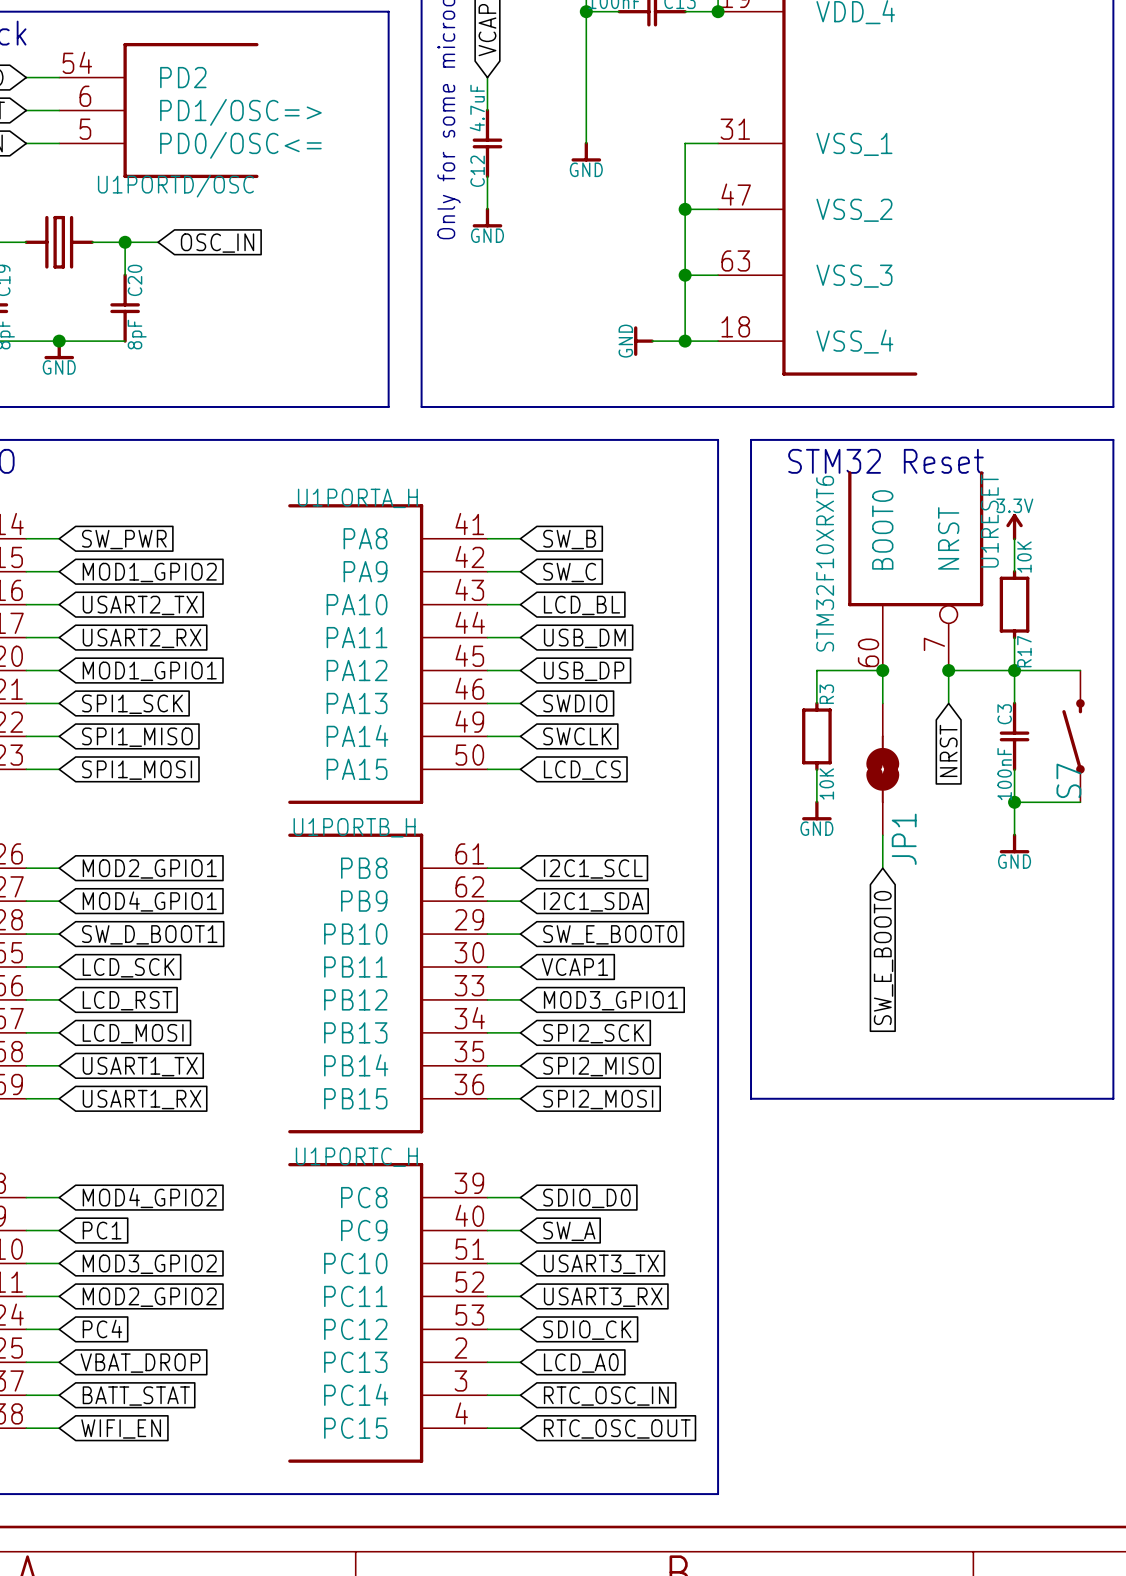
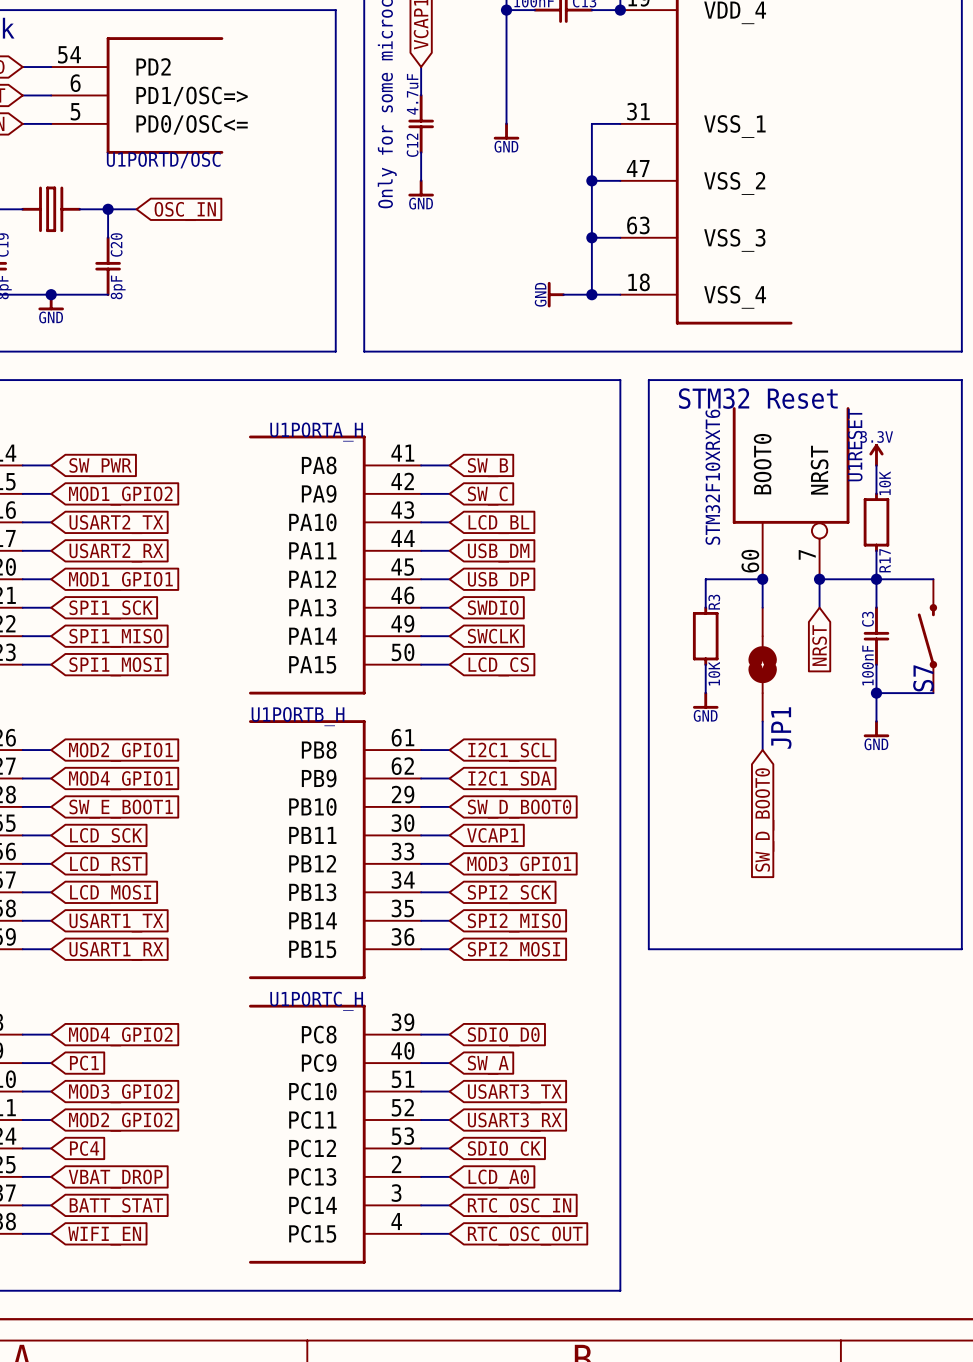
global label: SW_D_BOOT1 (149, 934) -> SW_E_BOOT1 (121, 809)
global label: SW_E_BOOT0 (610, 934) -> SW_D_BOOT0 (519, 809)
global label: SW_E_BOOT0 (883, 957) -> SW_D_BOOT0 (764, 819)

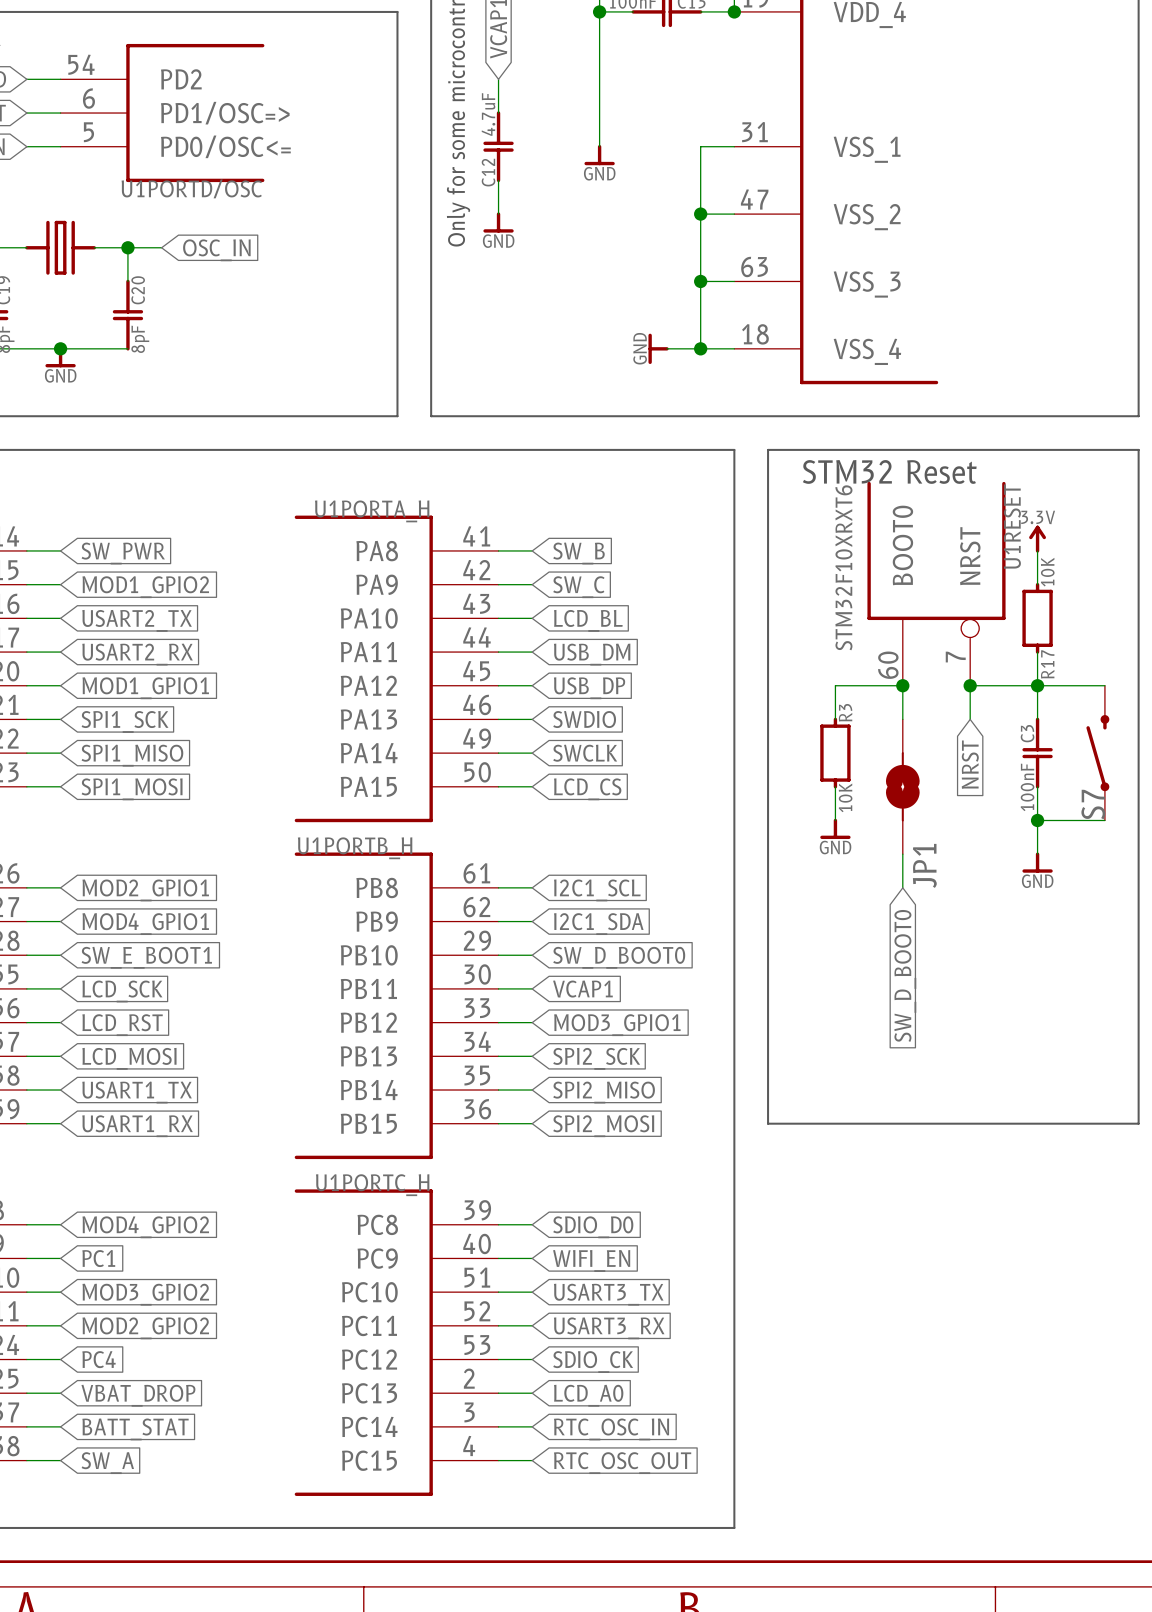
global label: SW_A (488, 1065) -> WIFI_EN (591, 1260)
global label: WIFI_EN (104, 1236) -> SW_A (107, 1463)

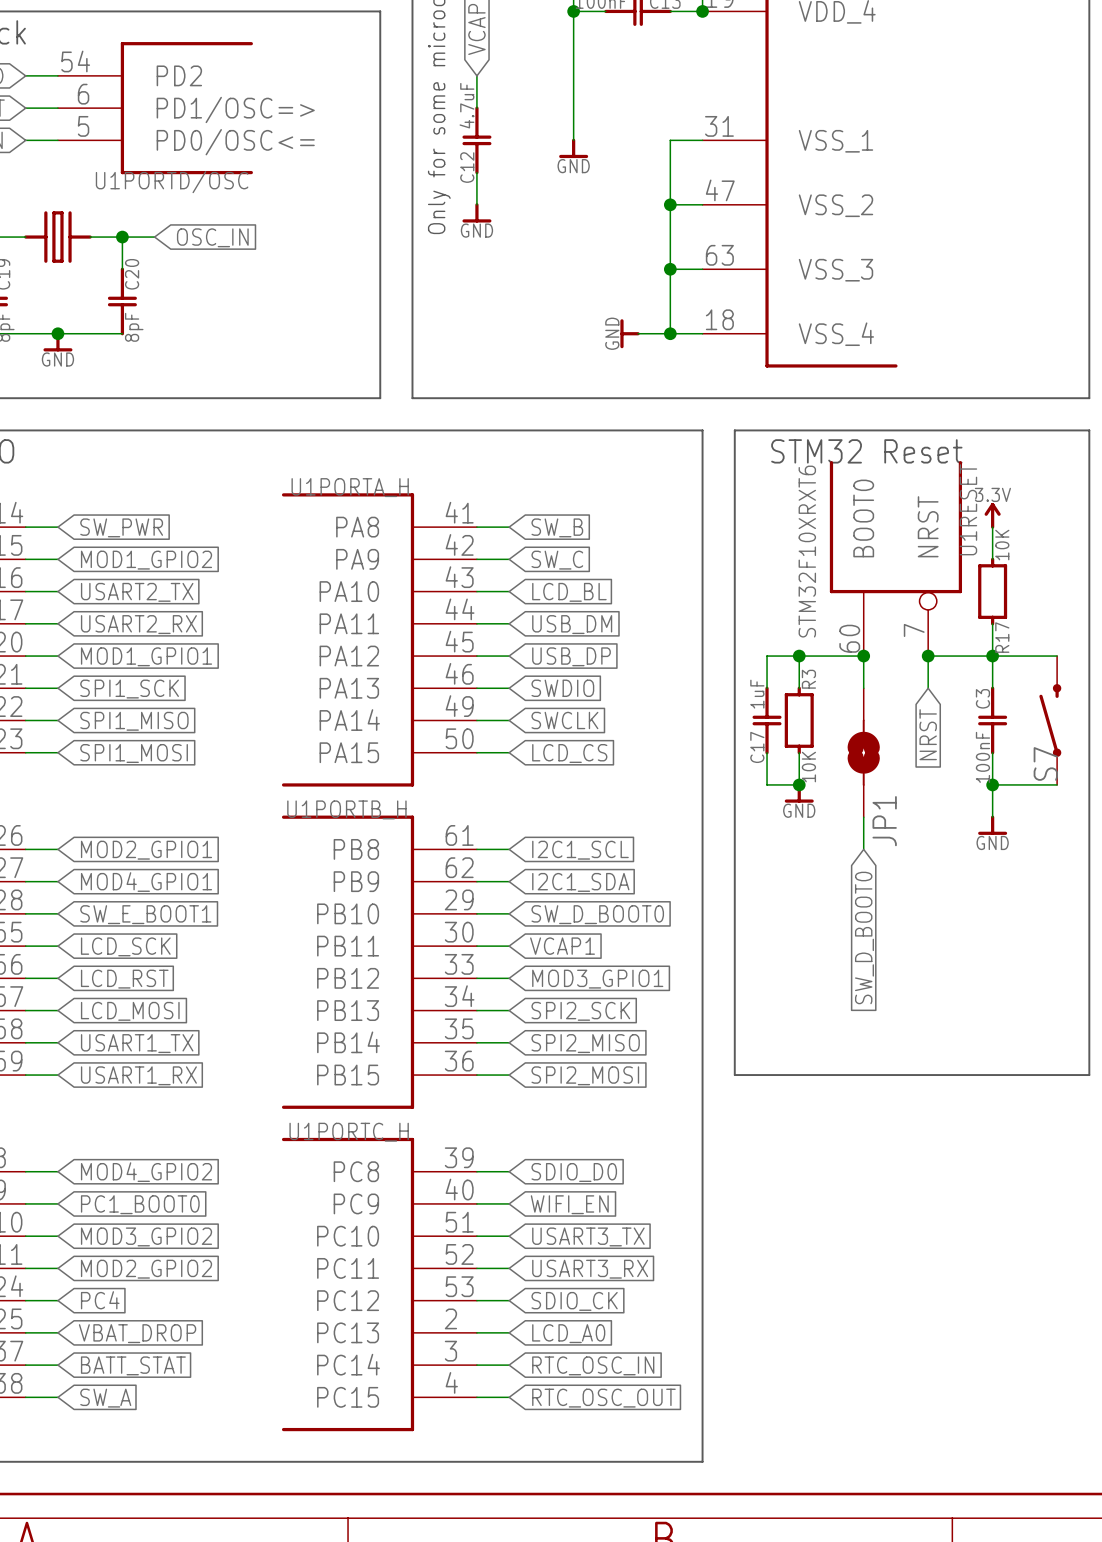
wire: none -> (799, 656) (767, 656) (767, 688)
junction: none -> (799, 656)
C17: none -> 1uF (767, 720)
wire: none -> (767, 752) (767, 784) (799, 784)
junction: none -> (799, 784)
global label: PC1 (98, 1258) -> PC1_BOOT0 (140, 1204)

